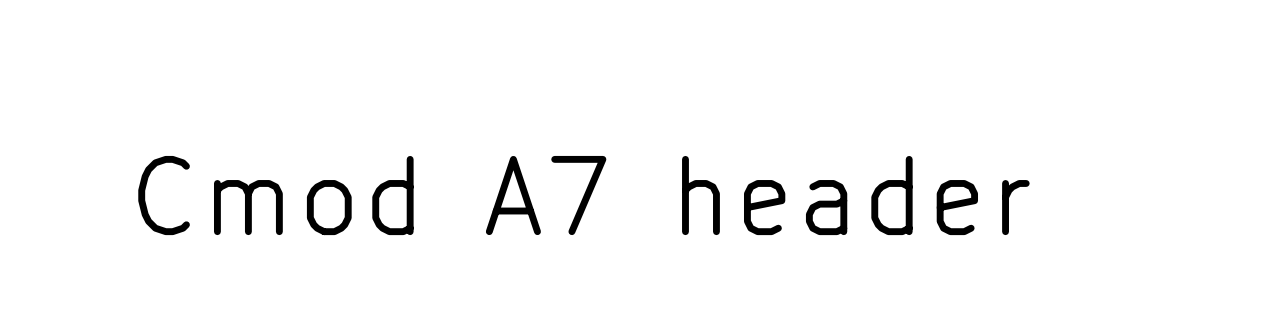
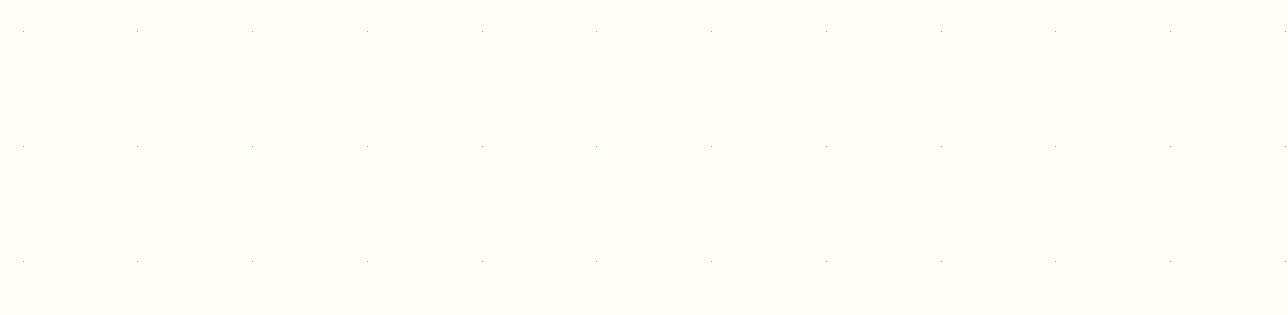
text: Cmod A7 header (583, 195) -> none

